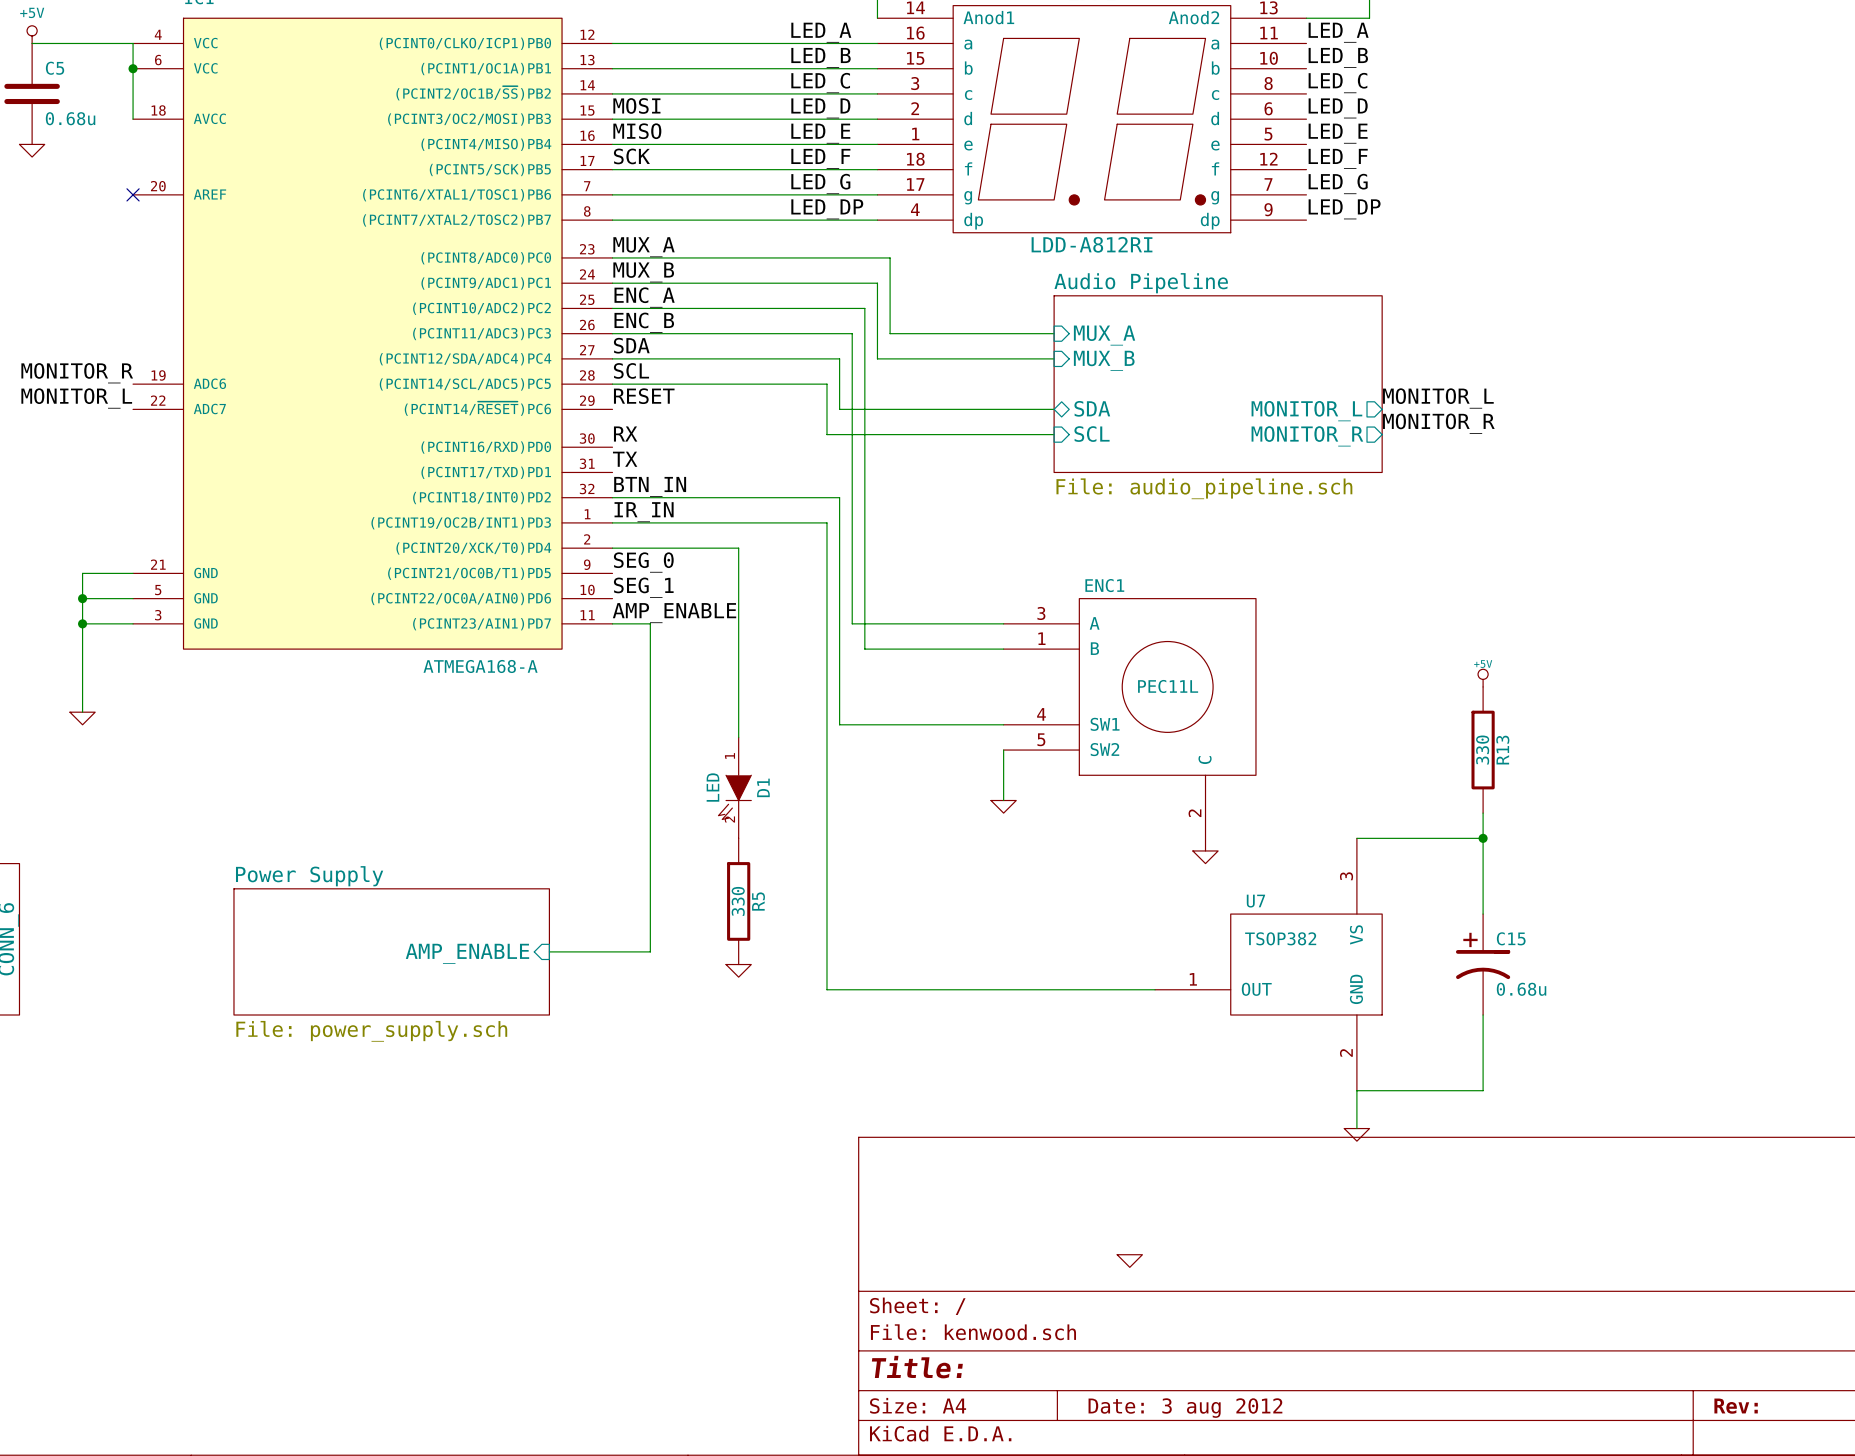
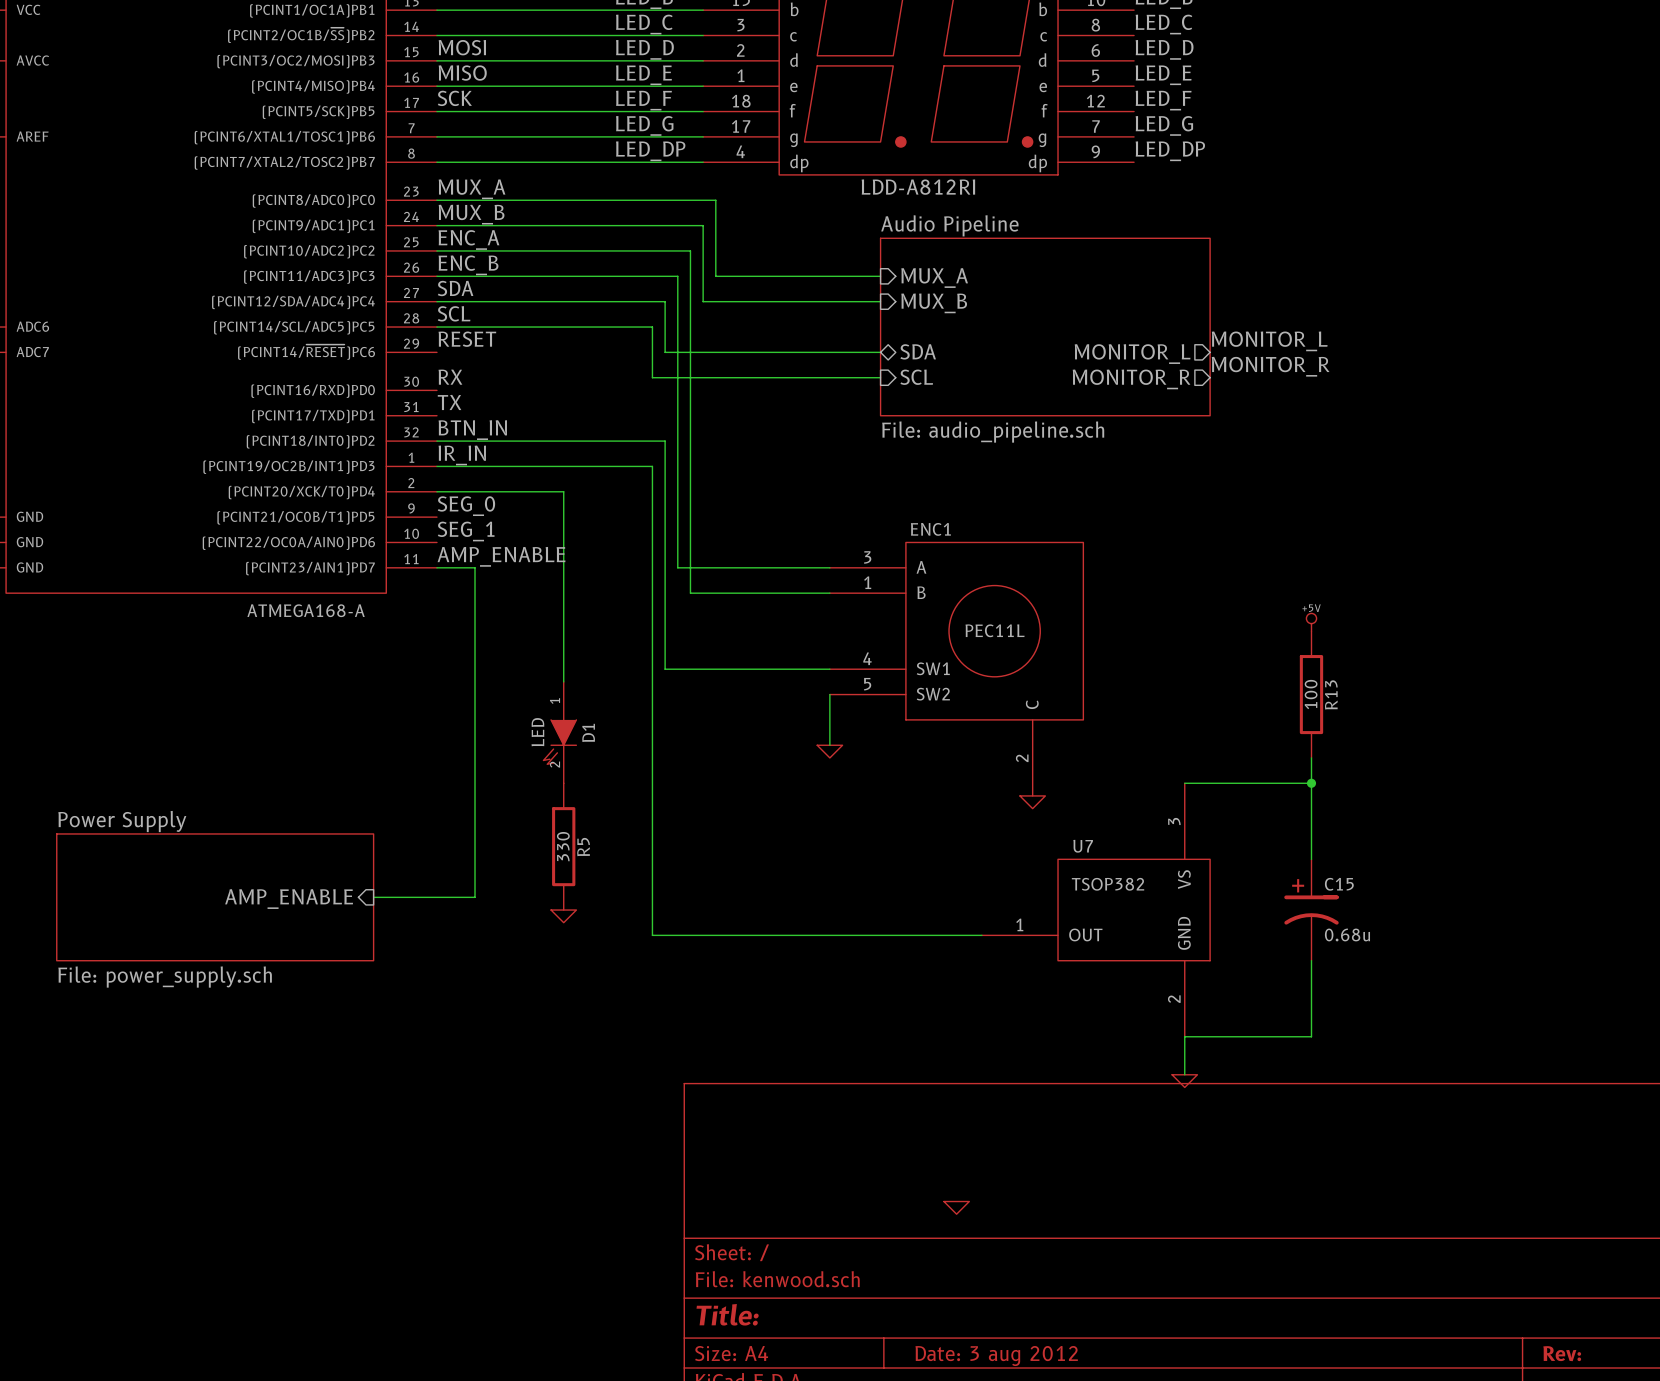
R13 value: 330 (1482, 750) -> 100 (1311, 694)

